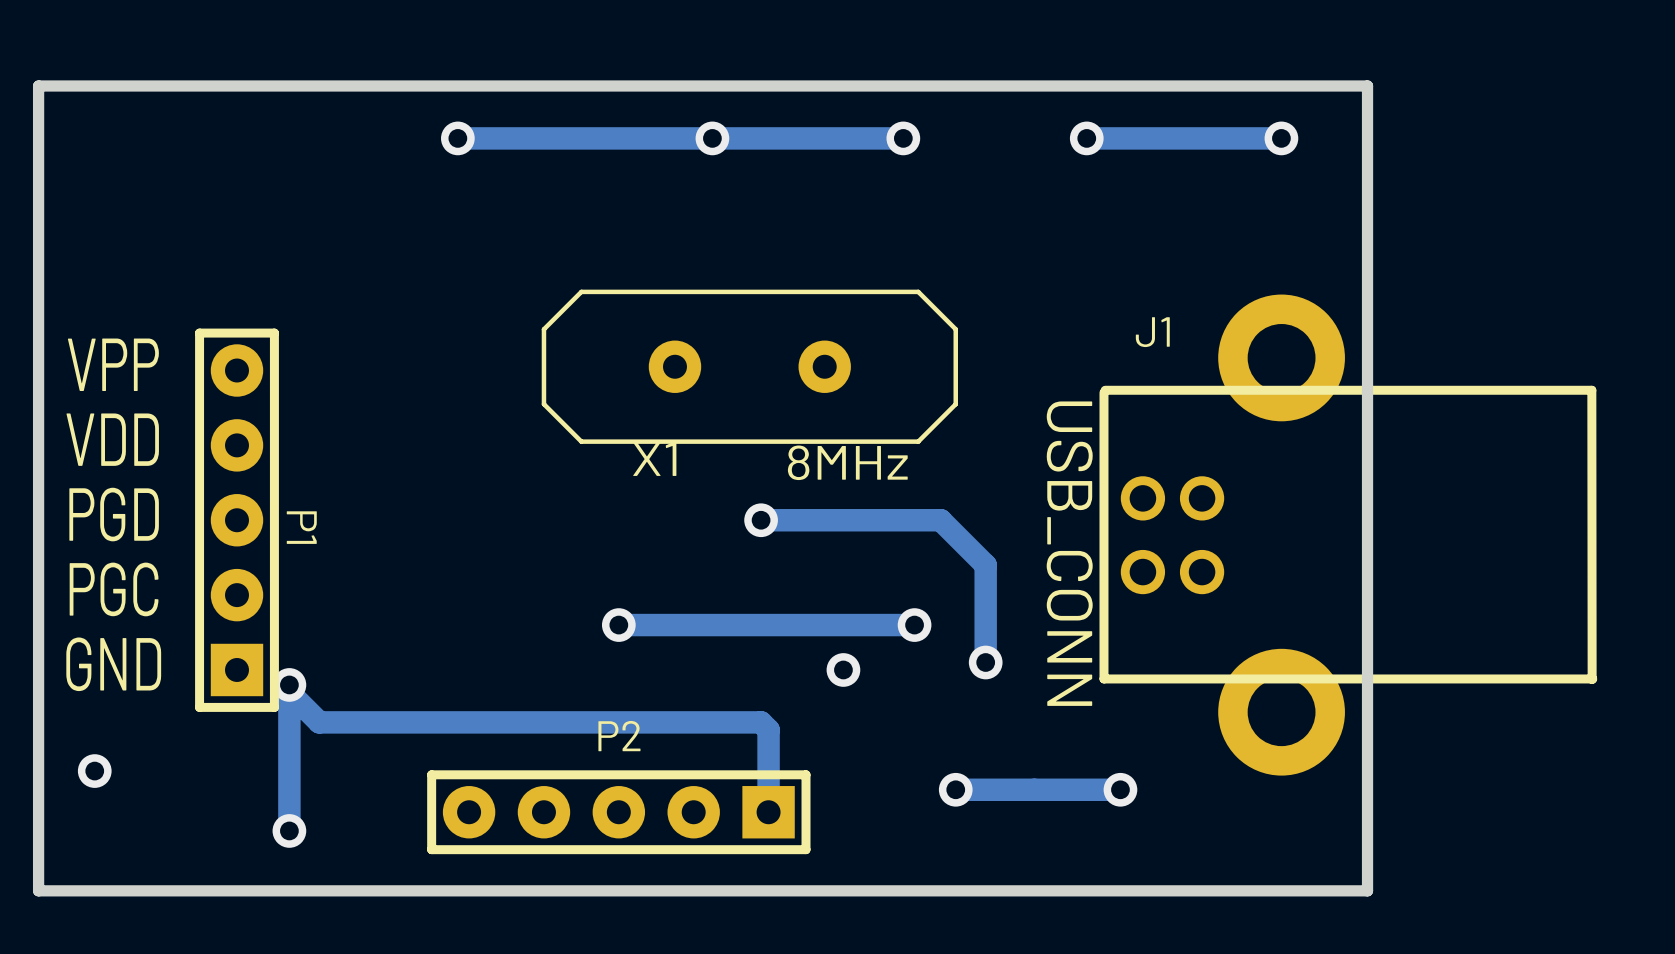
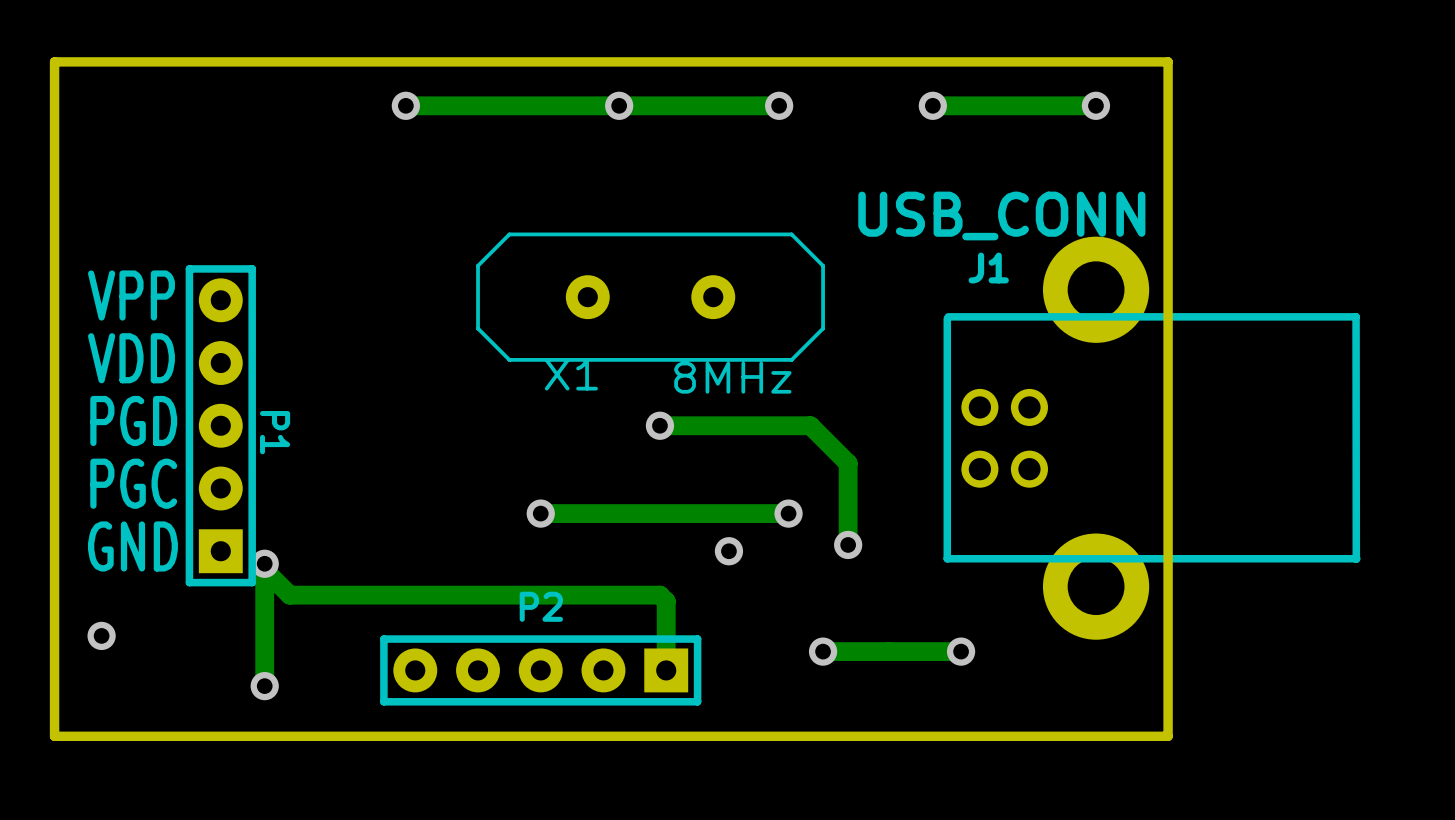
text position: VPP (113, 364) -> VPP (131, 295)
text position: VDD (112, 439) -> VDD (131, 358)
text position: PGD (114, 514) -> PGD (133, 420)
J1 value rotation: 0° (1069, 553) -> 90° counterclockwise (1001, 215)
text position: PGC (114, 589) -> PGC (133, 483)
text position: GND (113, 664) -> GND (132, 546)

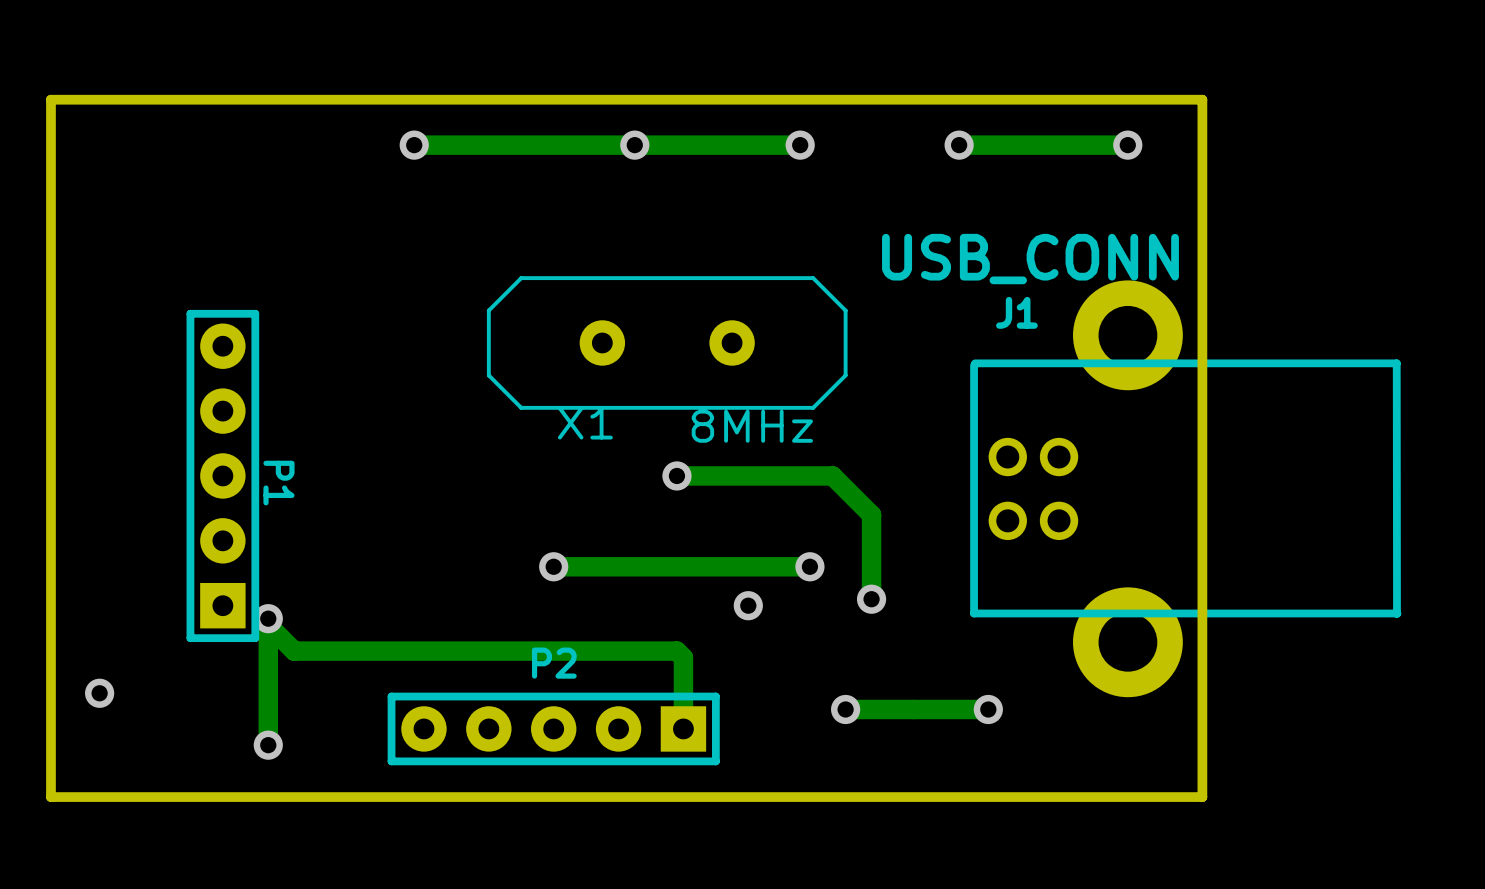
text: VPP (131, 295) -> none
text: VDD (131, 358) -> none
text: PGD (133, 420) -> none
text: PGC (133, 483) -> none
text: GND (132, 546) -> none

